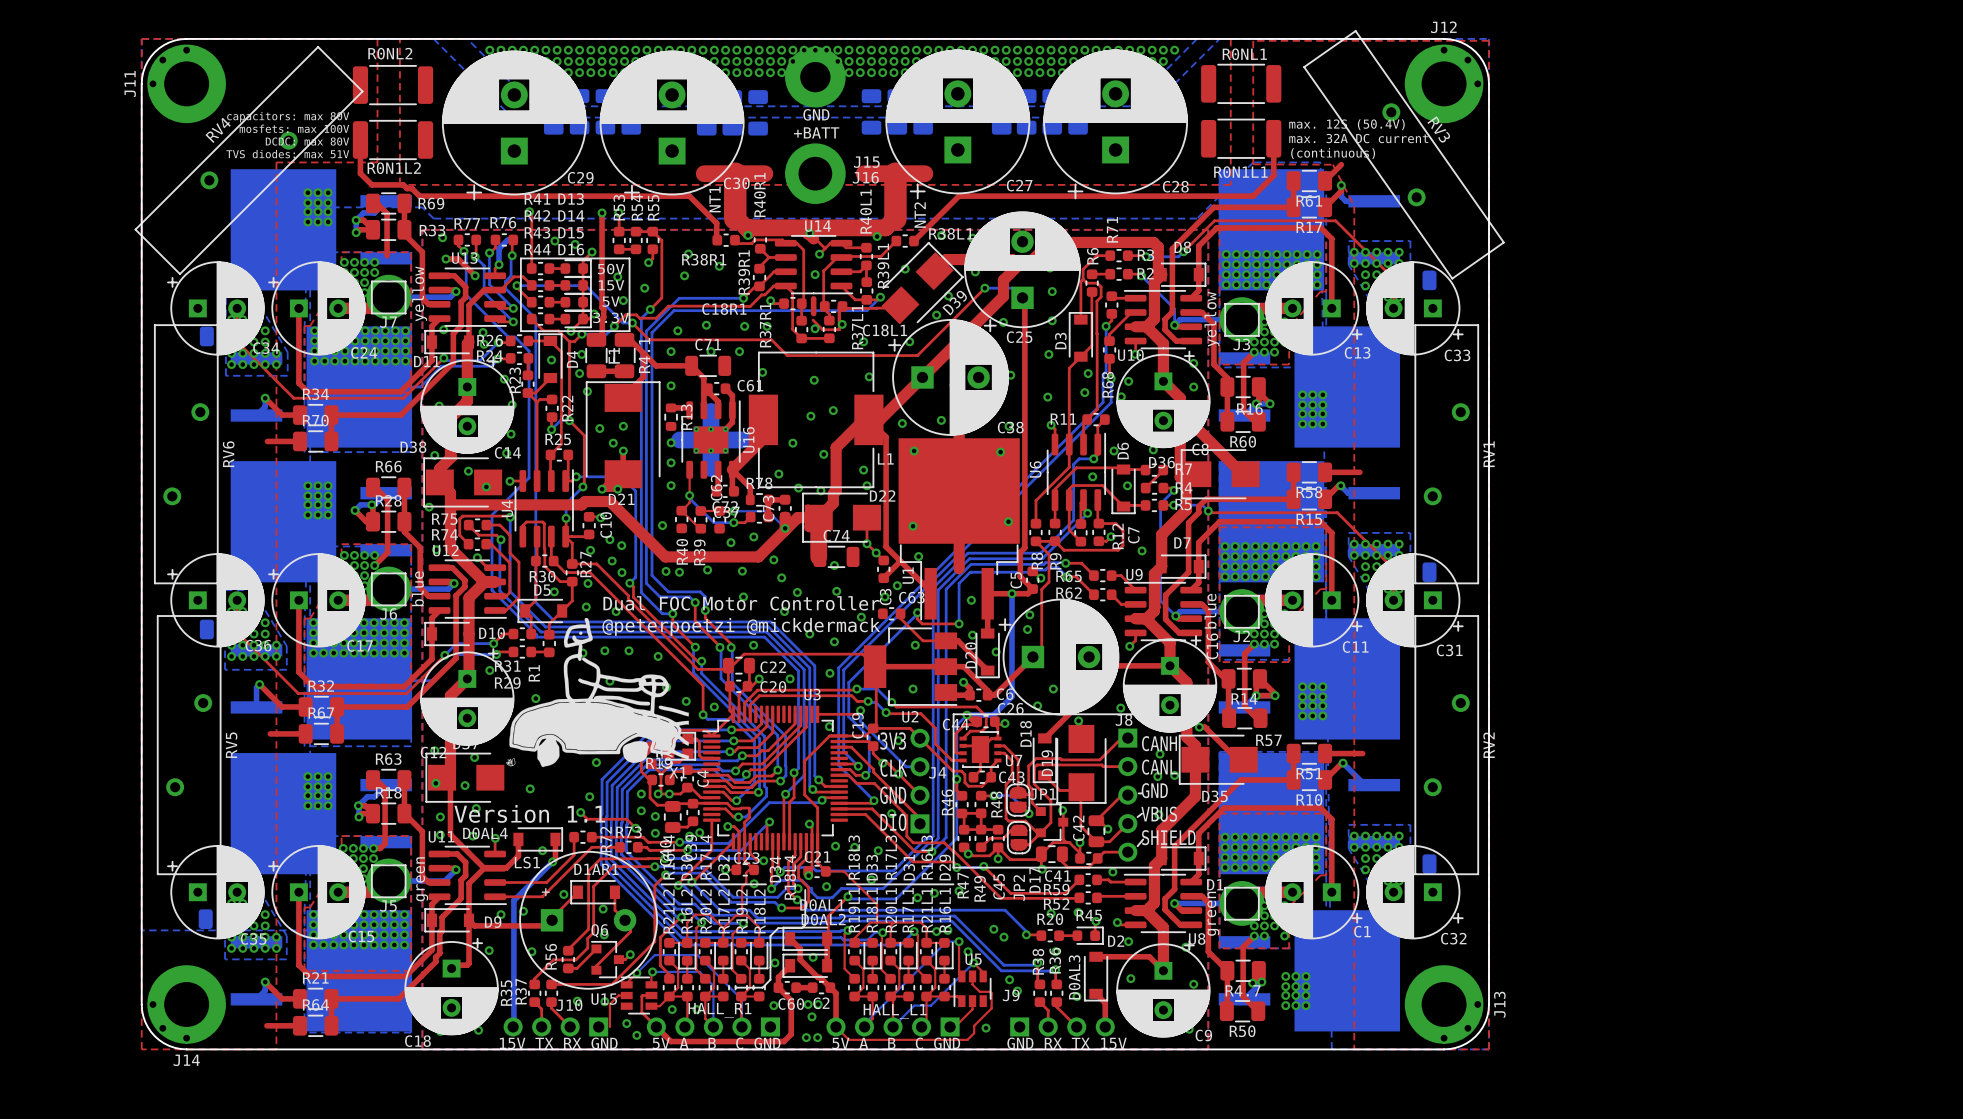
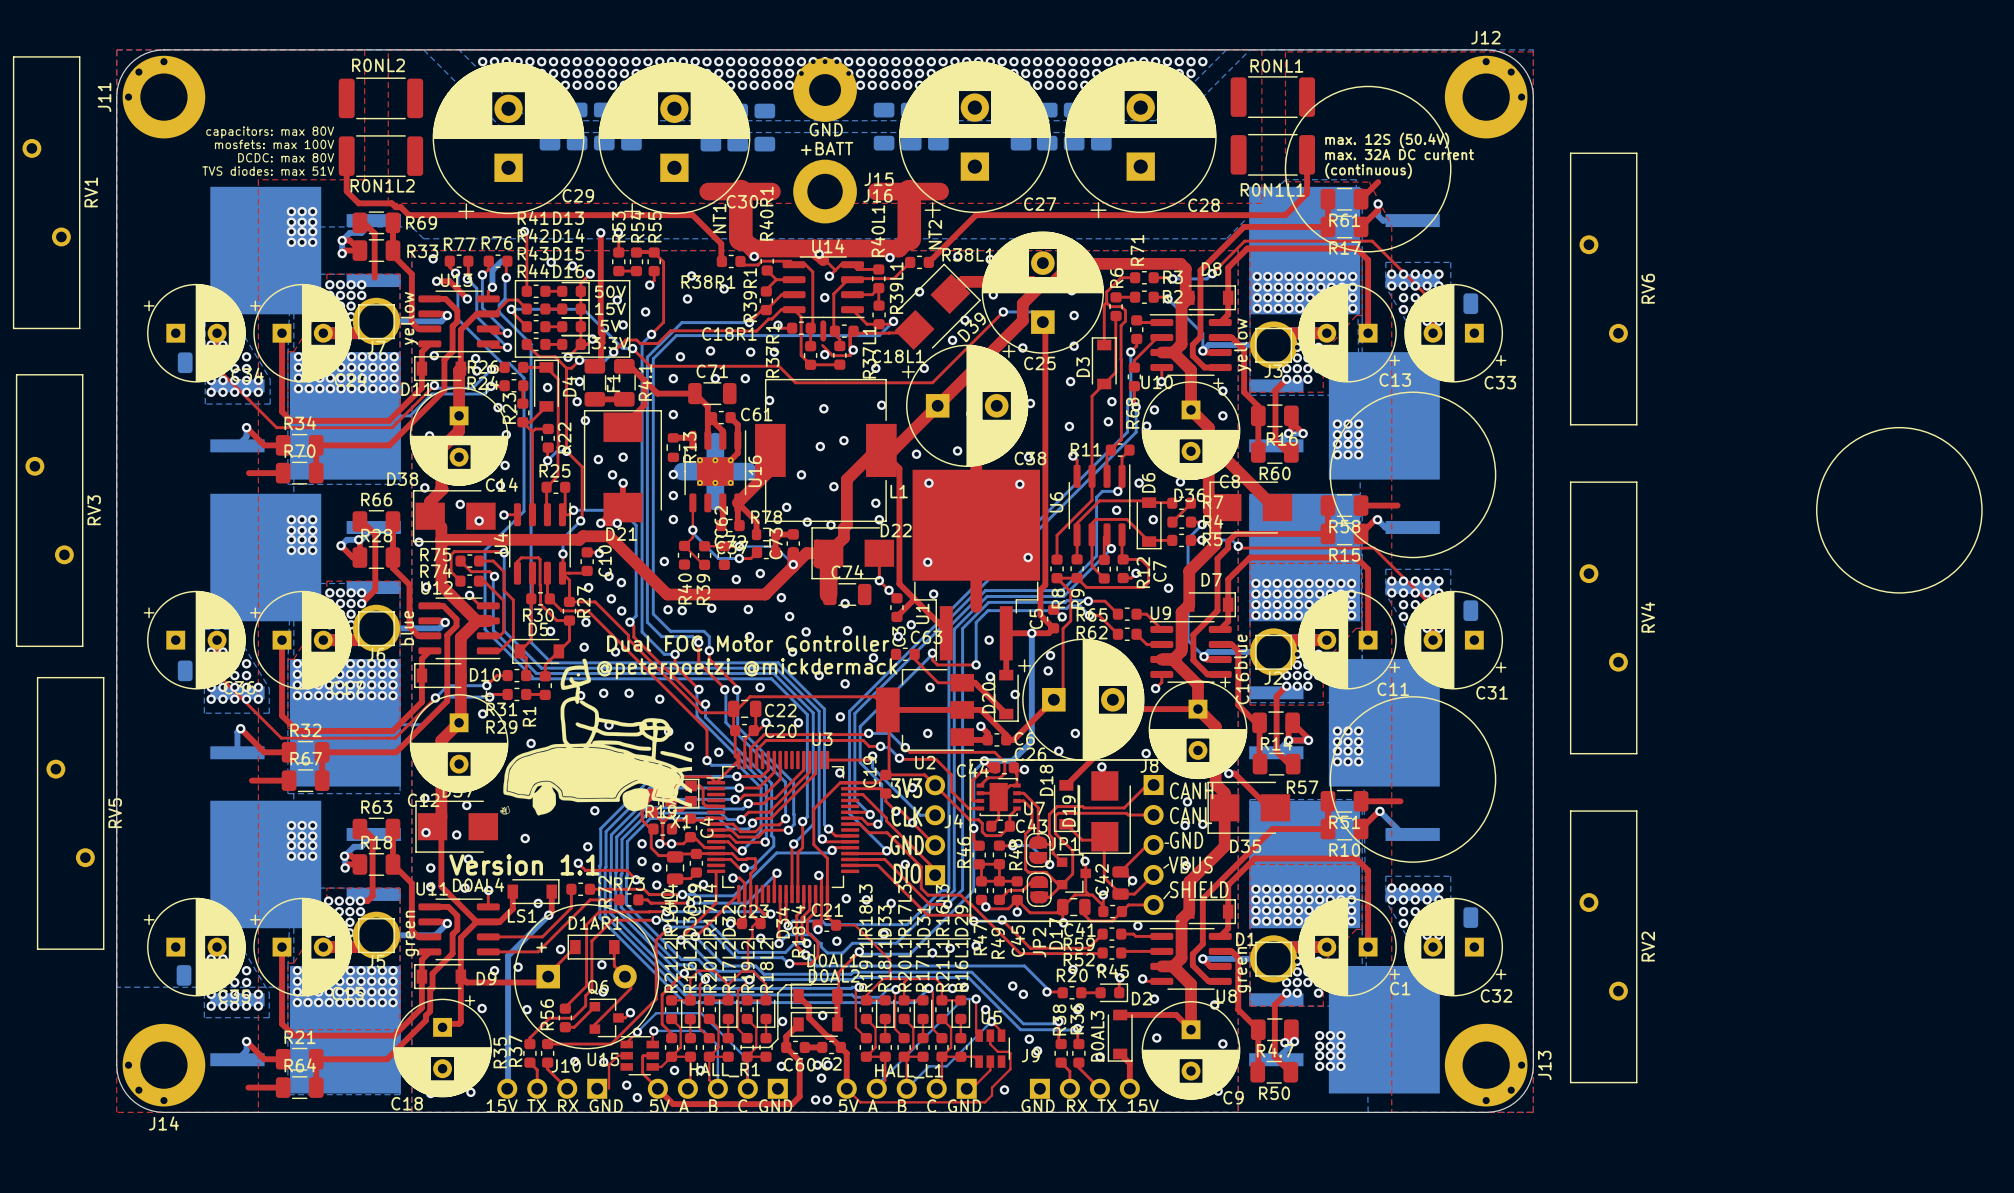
RV3 footprint: [1303, 30, 1505, 280] -> [15, 374, 84, 648]
RV4 footprint: [134, 46, 364, 275] -> [1569, 481, 1638, 755]
drawing: none -> [1284, 85, 1452, 253]
RV3 name position: RV3 (1438, 129) -> RV3 (94, 510)
RV4 name position: RV4 (218, 130) -> RV4 (1647, 617)
RV6 footprint: [154, 324, 219, 585] -> [1569, 152, 1638, 426]
RV1 footprint: [1414, 324, 1479, 585] -> [12, 56, 81, 330]
drawing: none -> [1329, 391, 1497, 559]
drawing: none -> [1816, 426, 1983, 594]
RV5 footprint: [157, 615, 222, 875] -> [36, 676, 105, 950]
RV2 footprint: [1414, 615, 1479, 875] -> [1569, 810, 1638, 1084]
drawing: none -> [1329, 696, 1497, 863]

